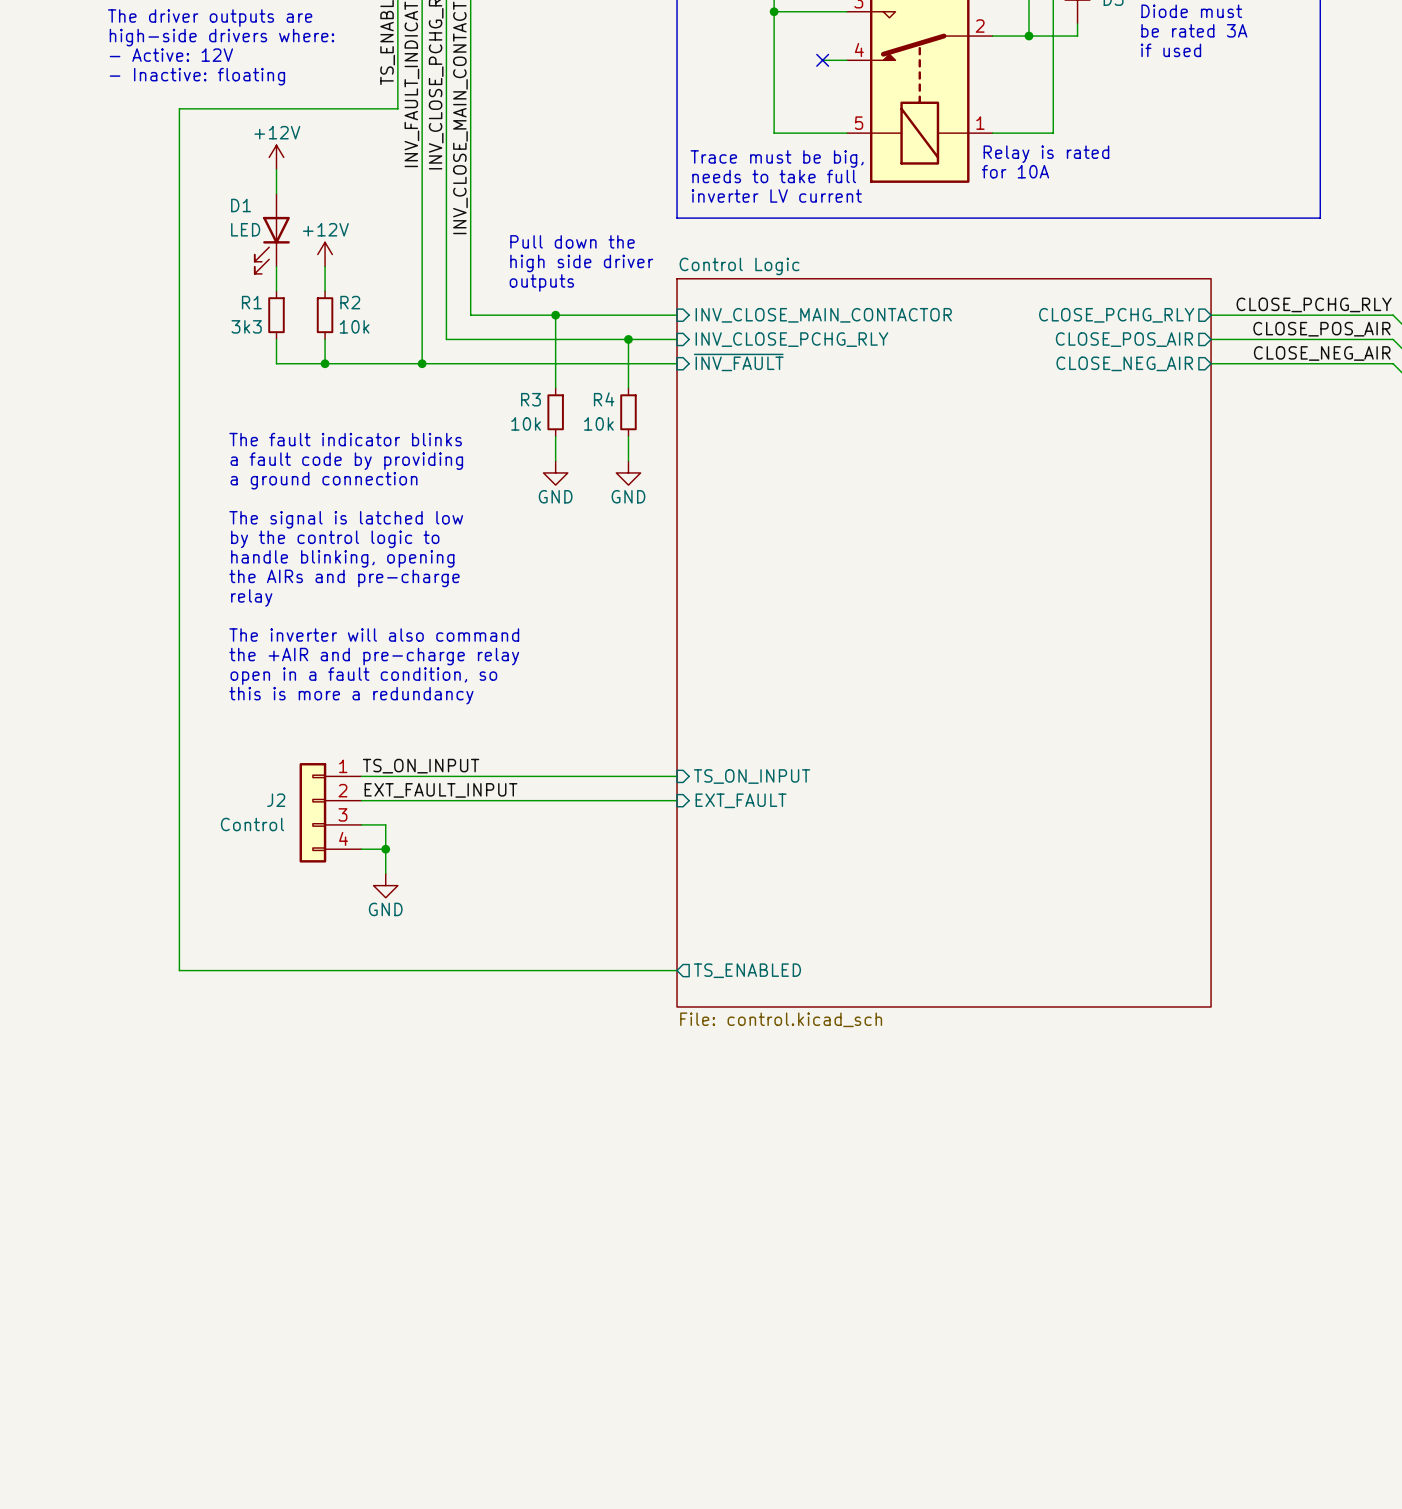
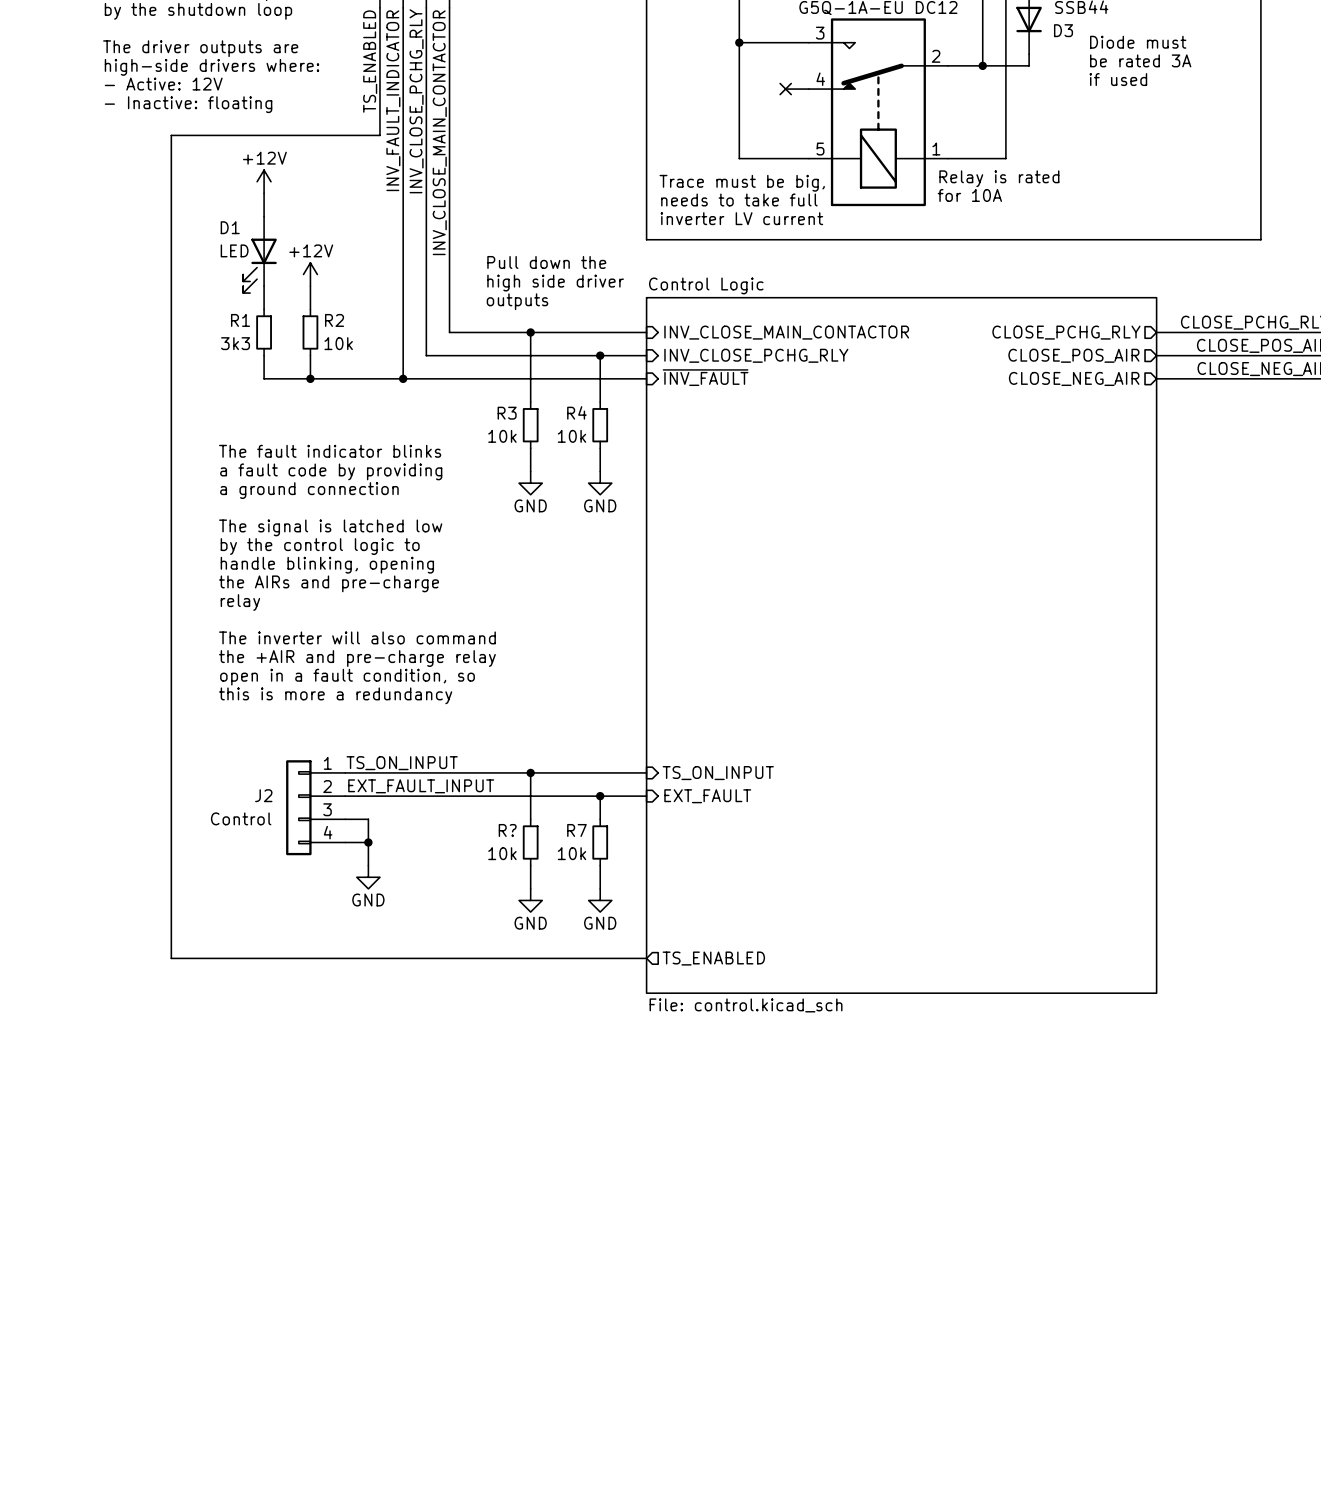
wire: none -> (530, 772) (530, 819)
junction: none -> (530, 772)
wire: none -> (600, 796) (600, 819)
junction: none -> (600, 796)
R?: none -> 10k (530, 842)
R7: none -> 10k (600, 842)
wire: none -> (530, 865) (530, 888)
wire: none -> (600, 865) (600, 888)
power symbol: none -> GND (530, 900)
power symbol: none -> GND (600, 900)

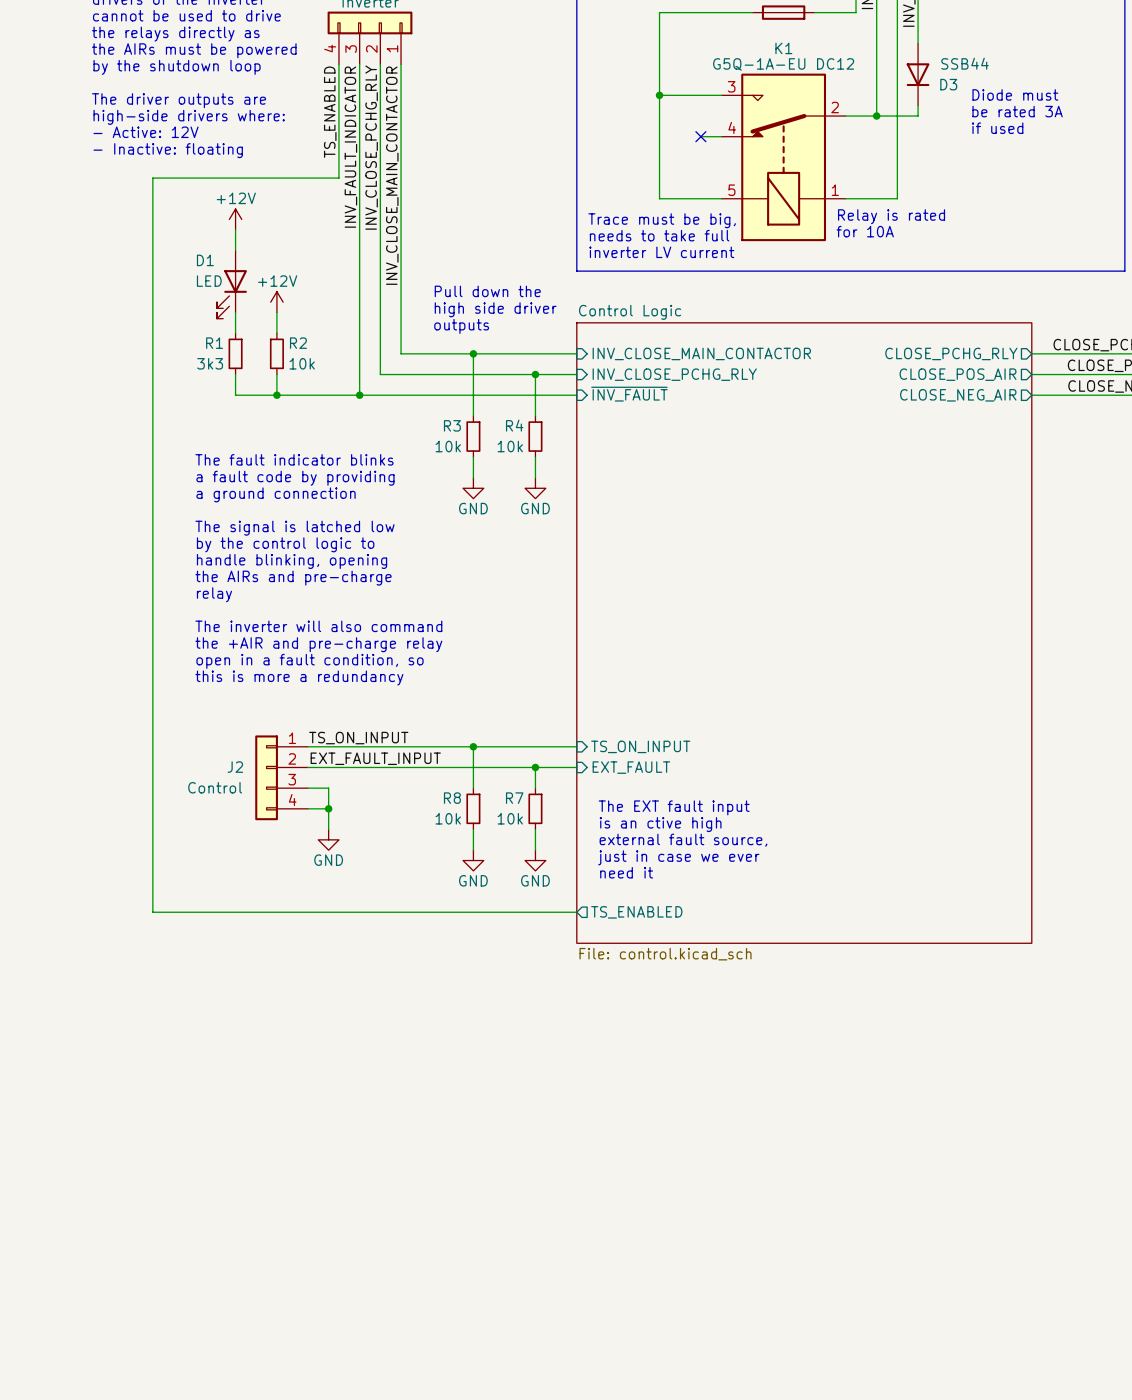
R? name: R? (507, 830) -> R8 (452, 798)
text: none -> The EXT fault input (674, 807)
text: none -> is an ctive high (660, 824)
text: none -> external fault source, (683, 840)
text: none -> just in case we ever (678, 857)
text: none -> need it (626, 872)

